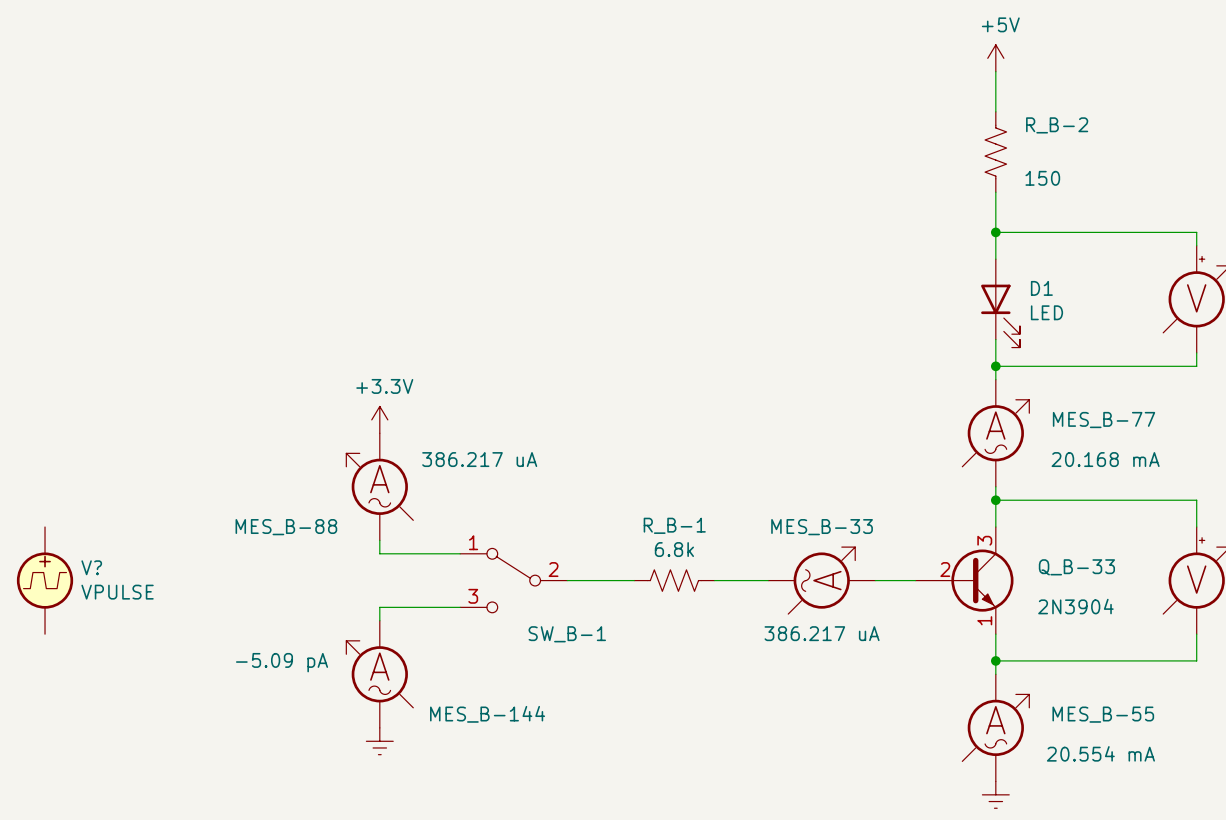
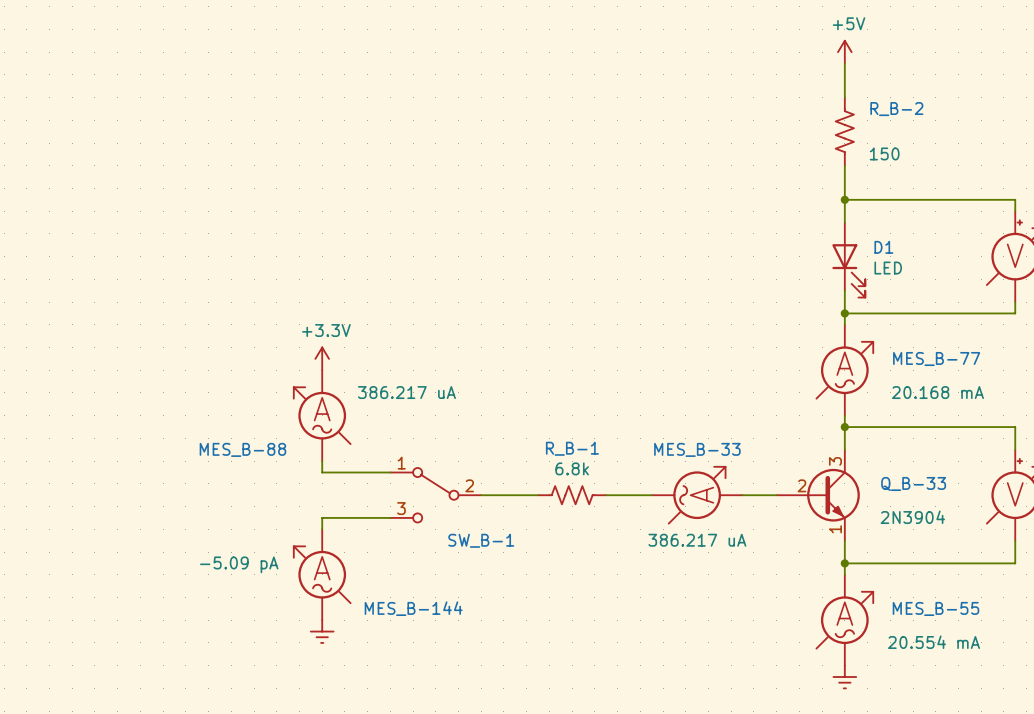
V?: VPULSE (45, 580) -> none

